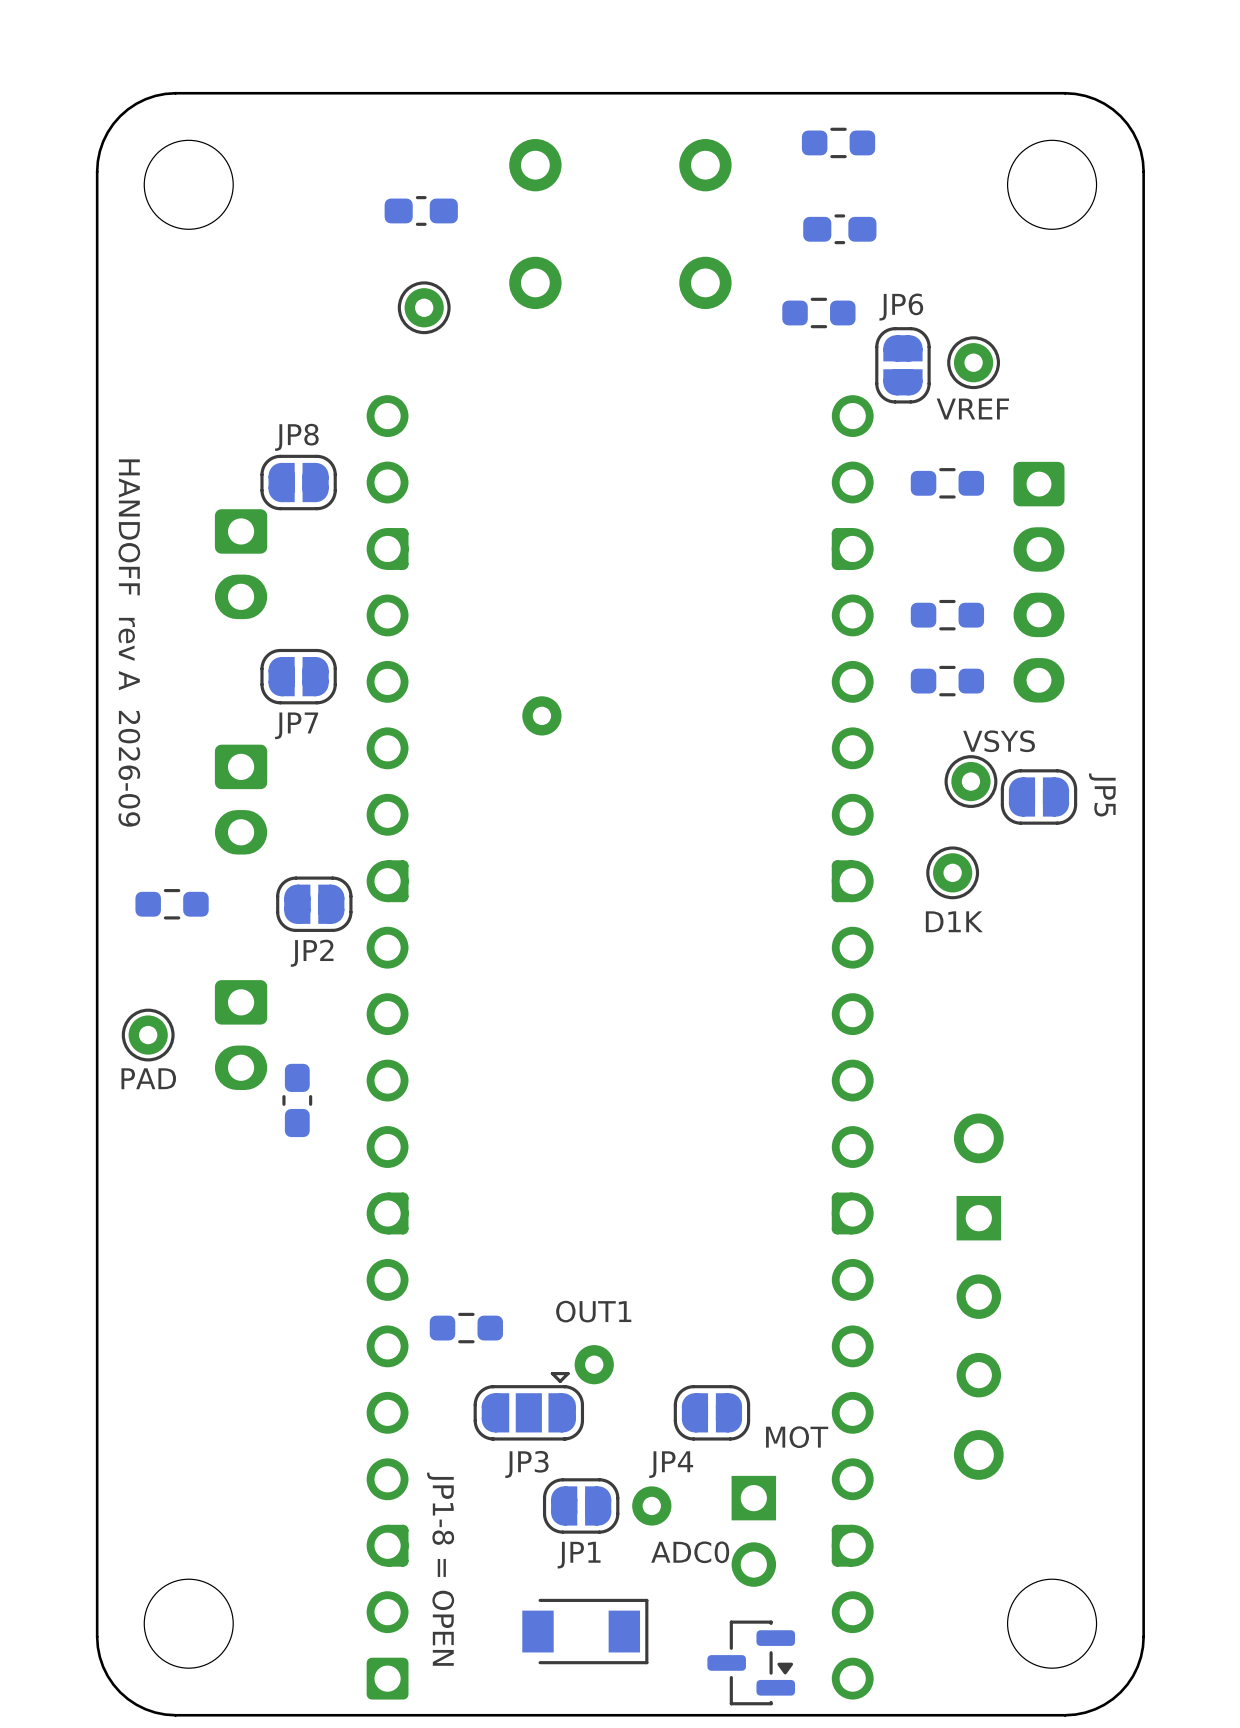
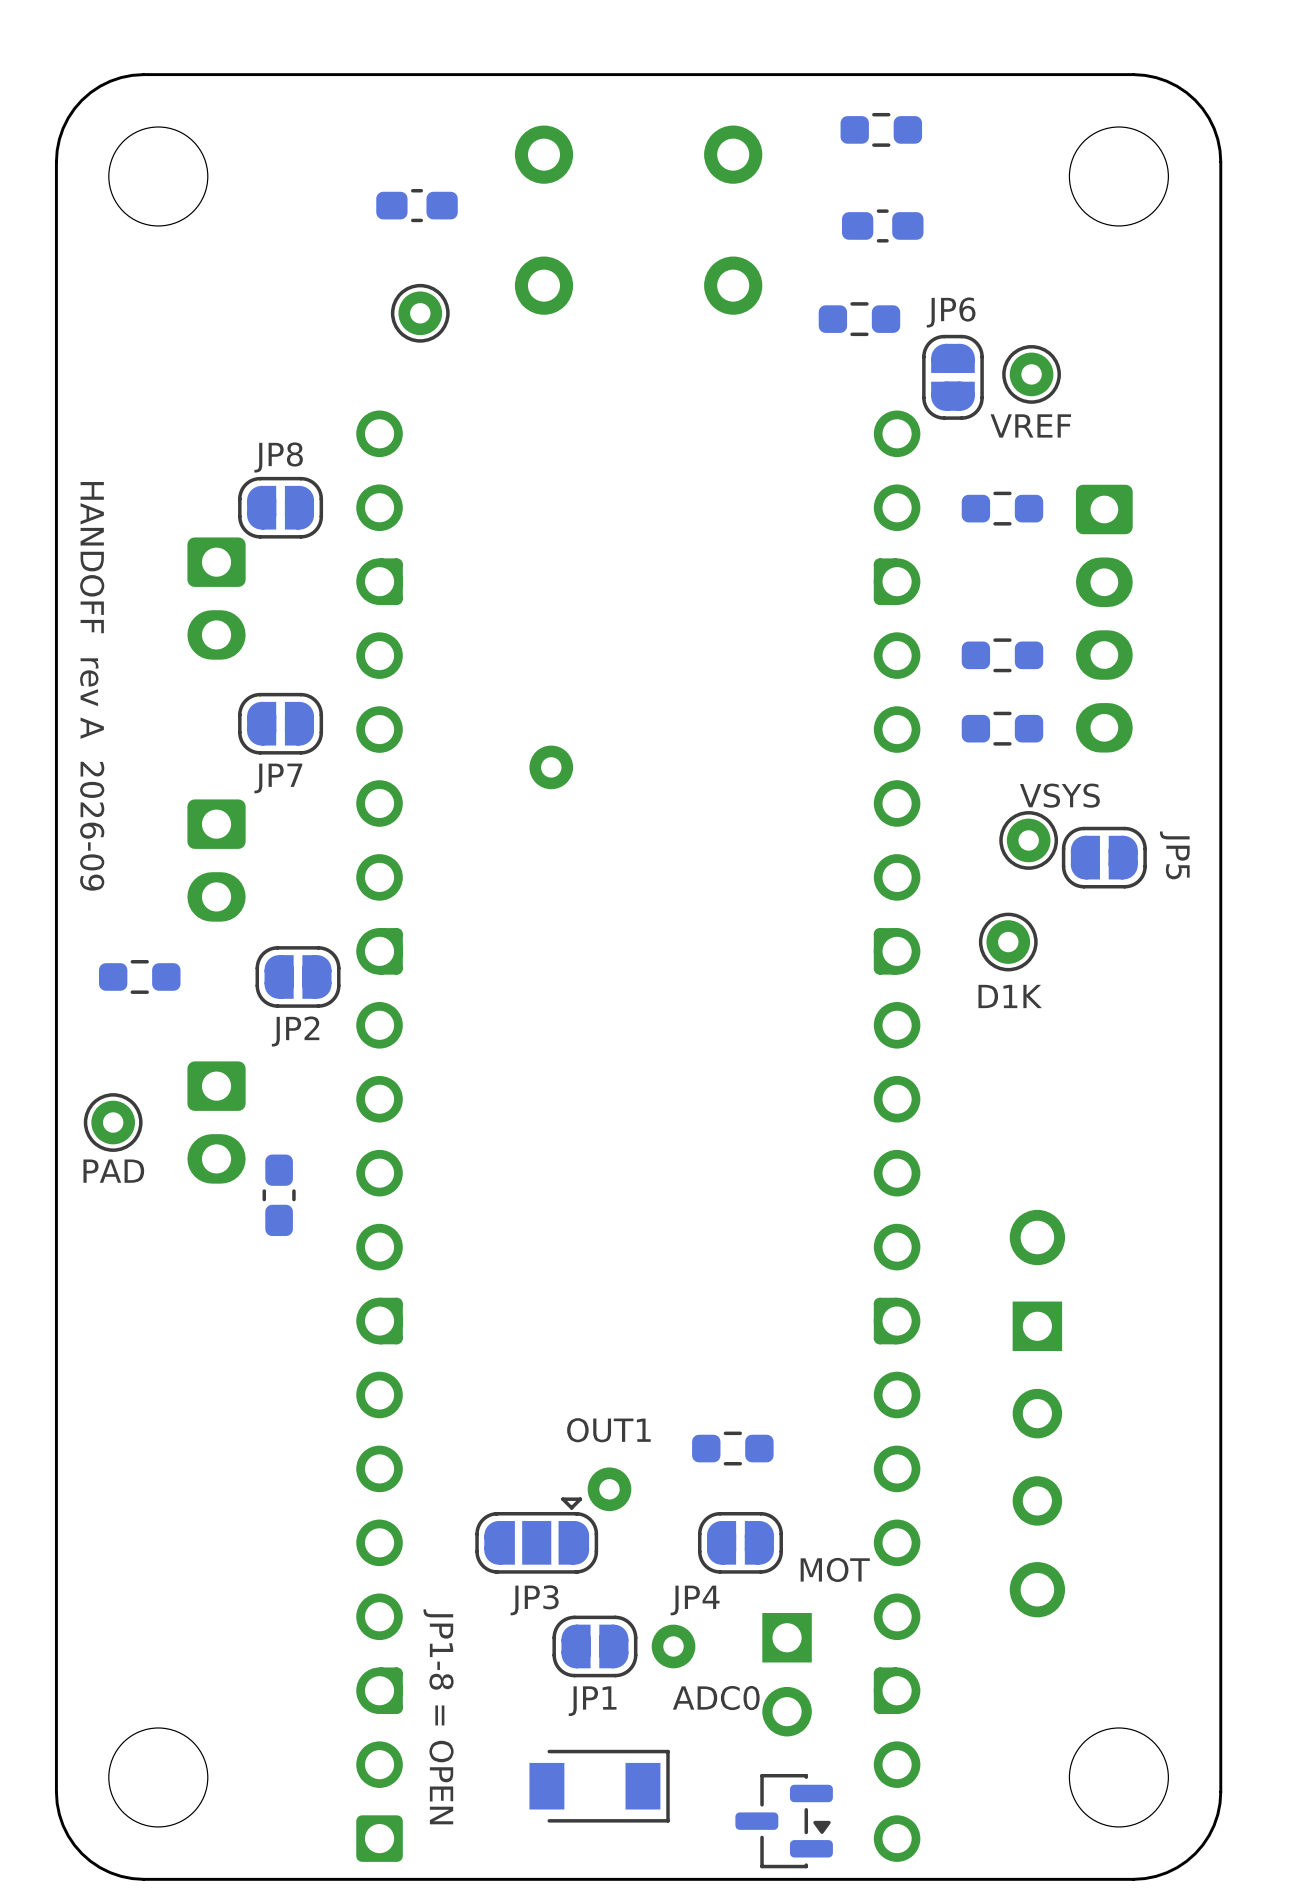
part position: (466, 1328) -> (732, 1448)

